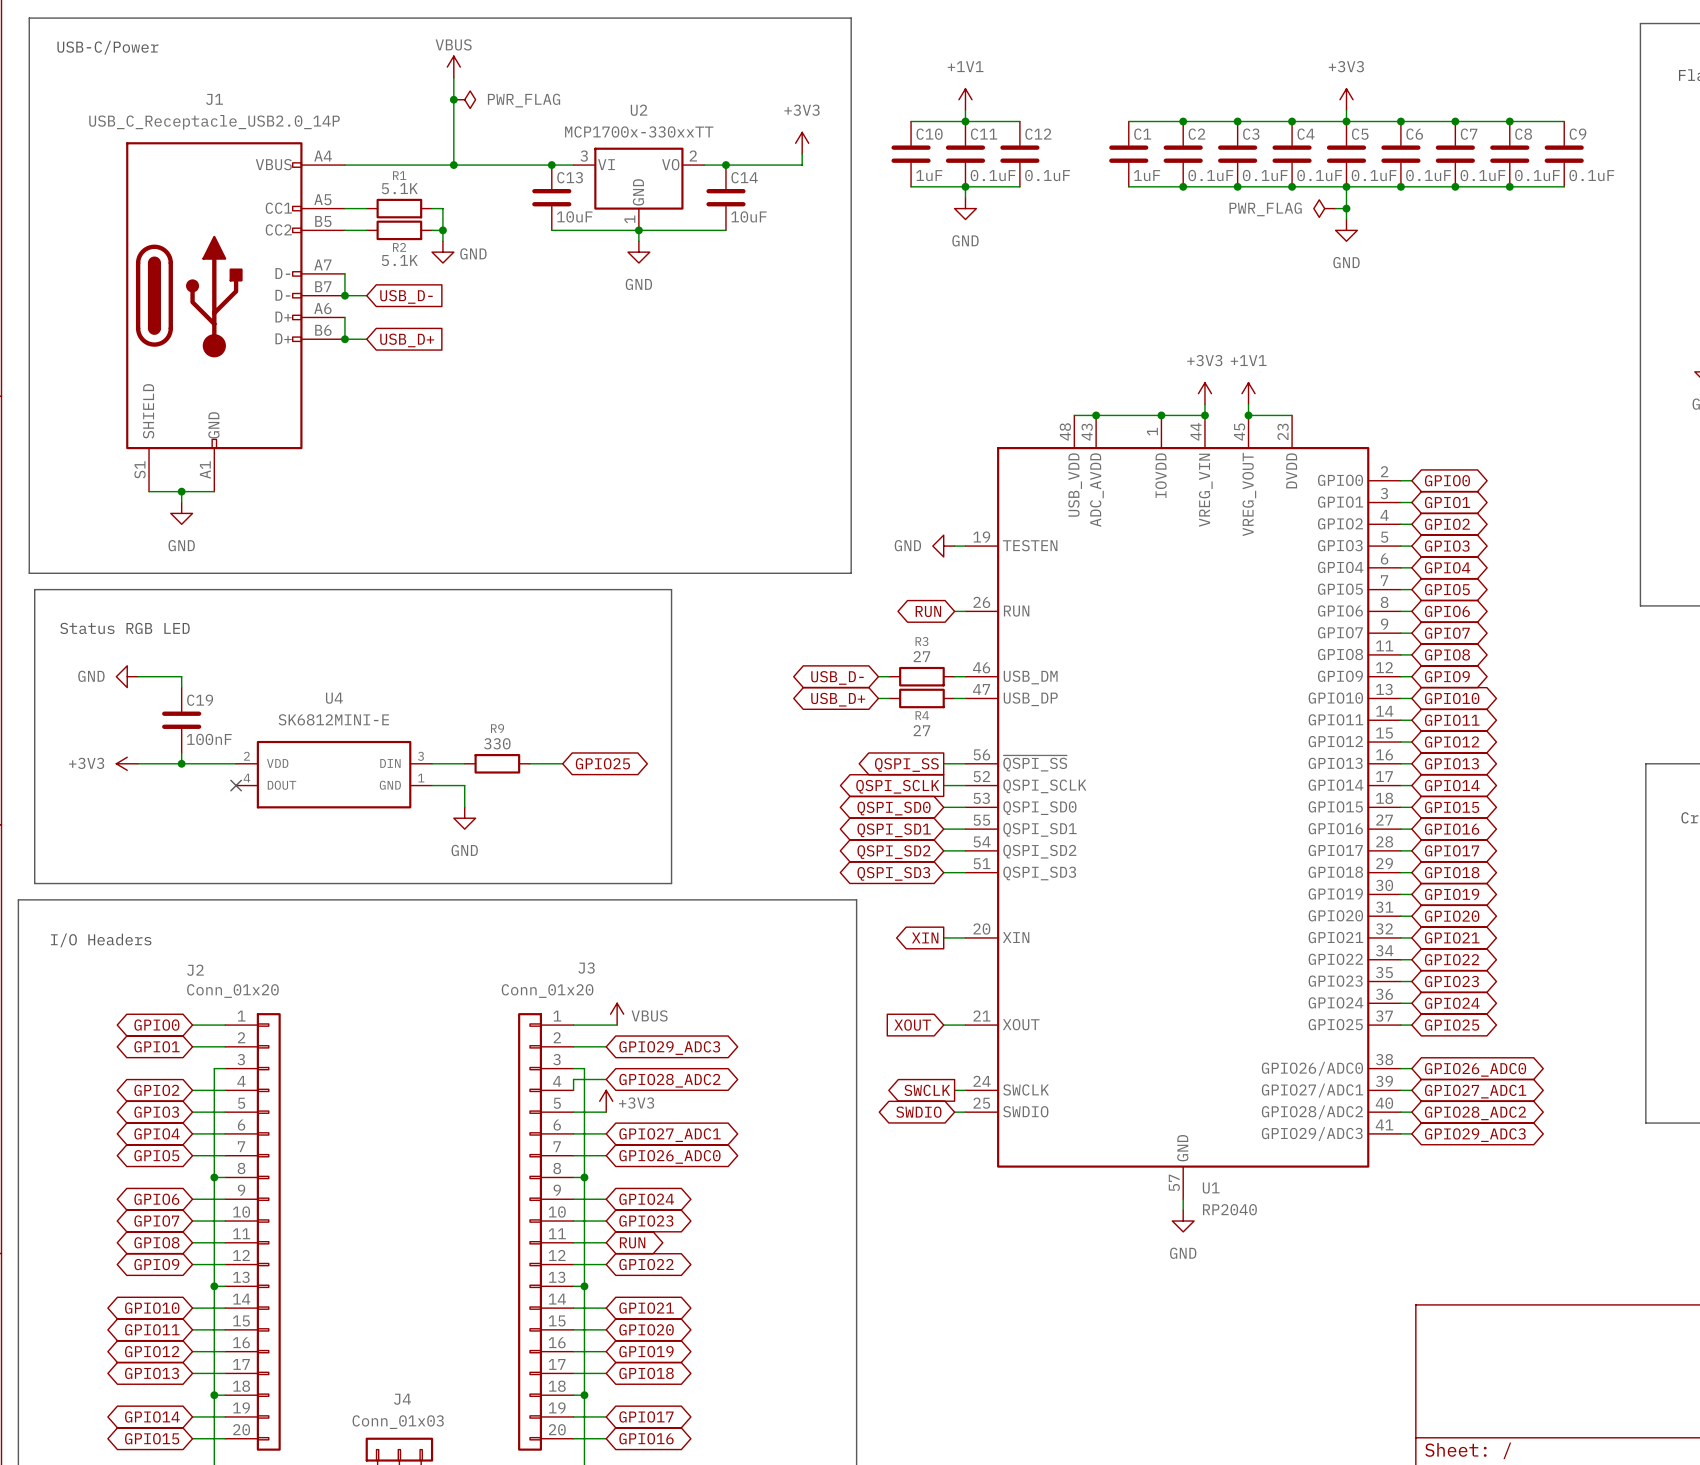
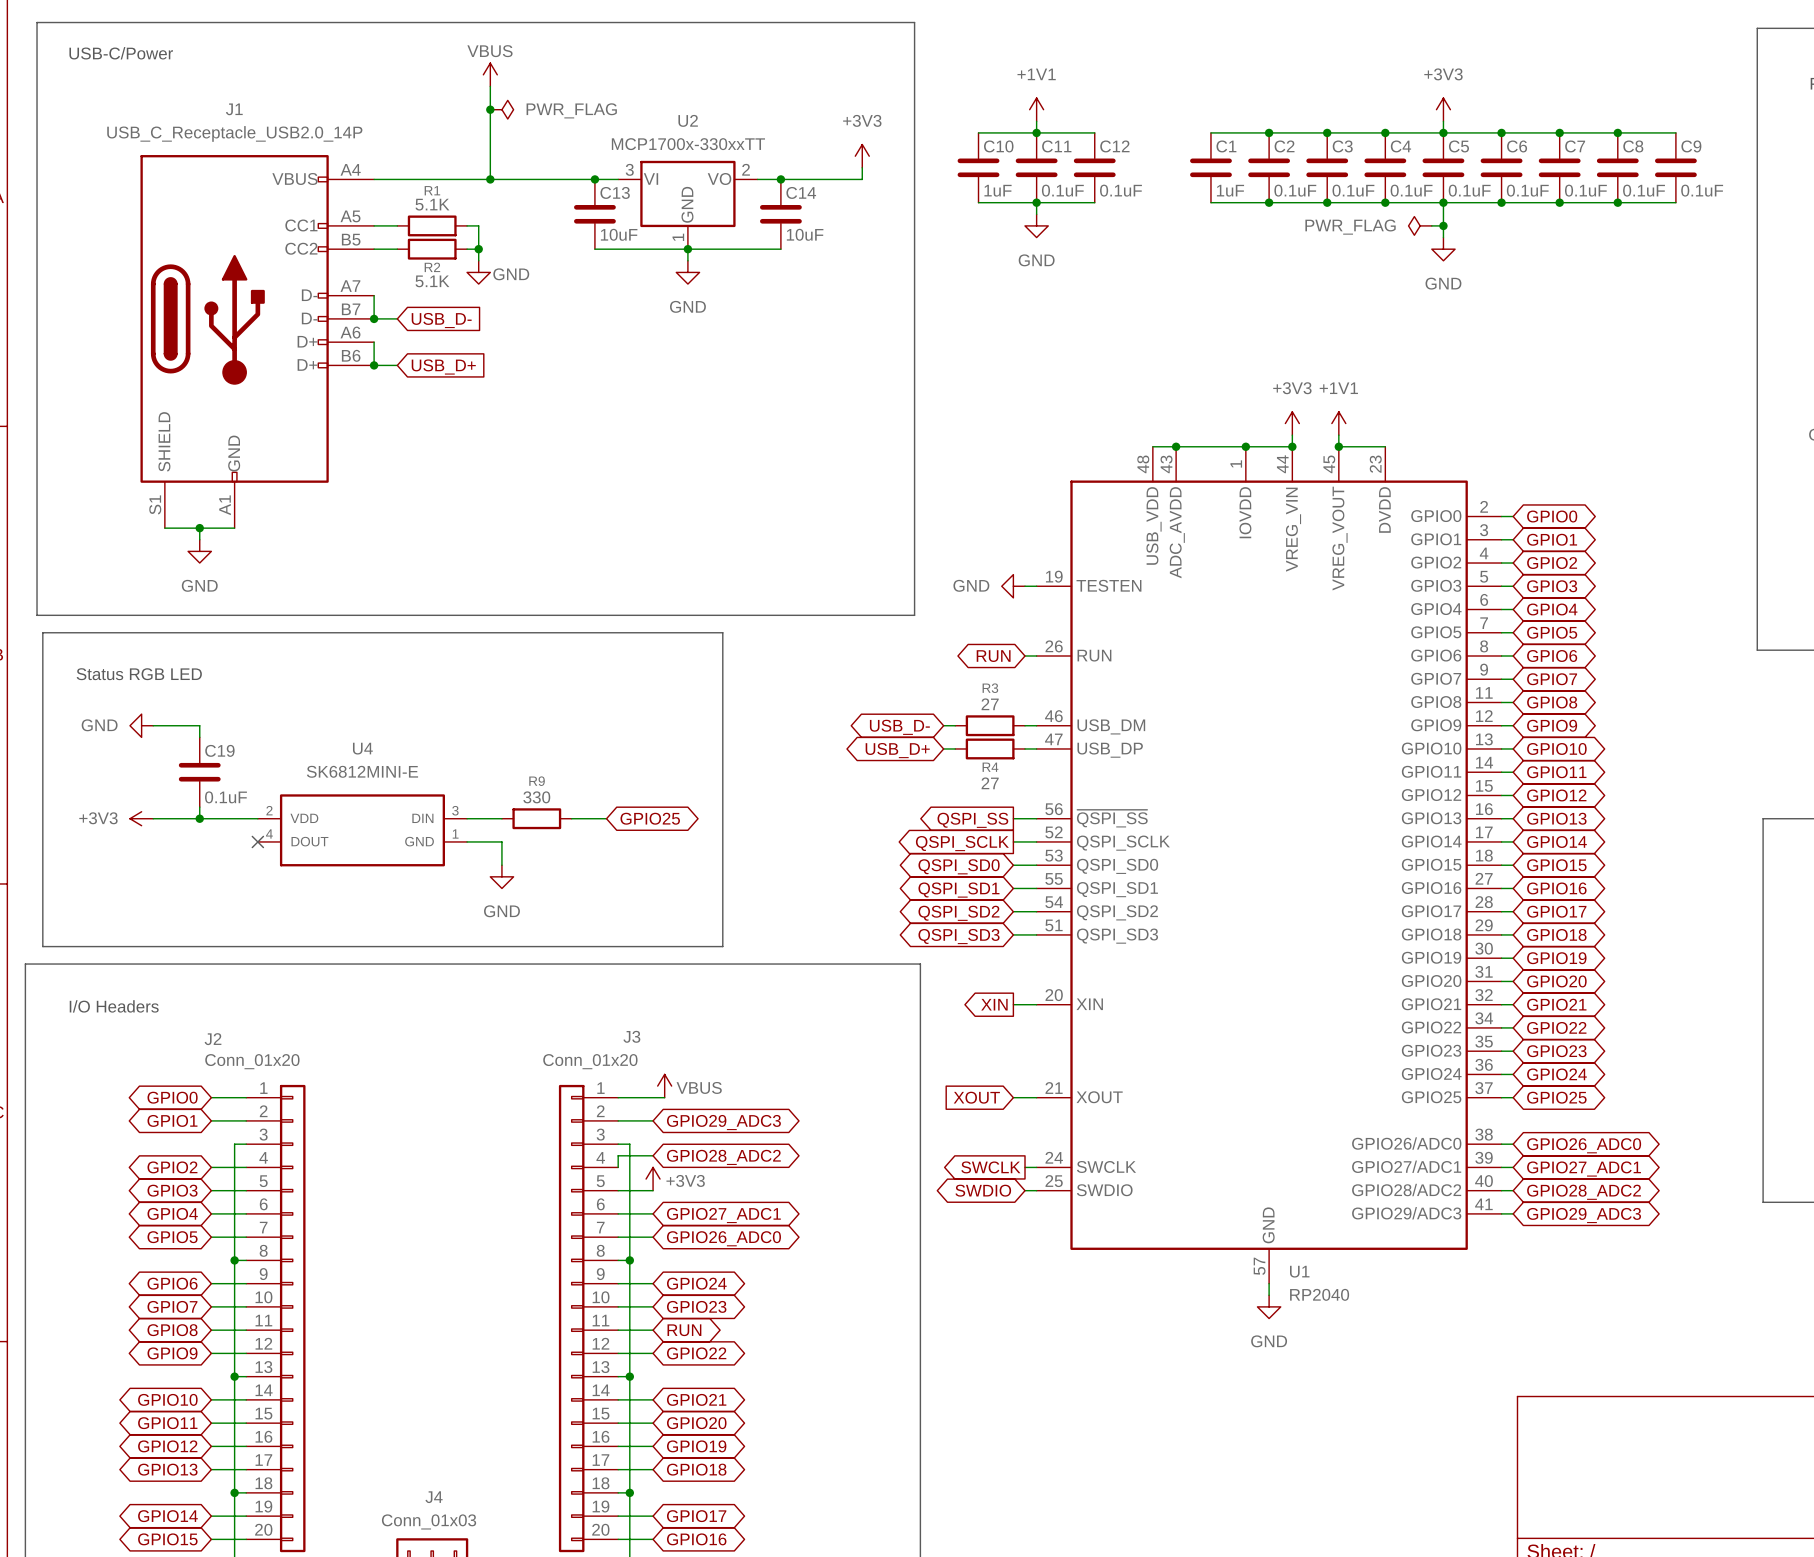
C19 value: 100nF (209, 739) -> 0.1uF (225, 797)

